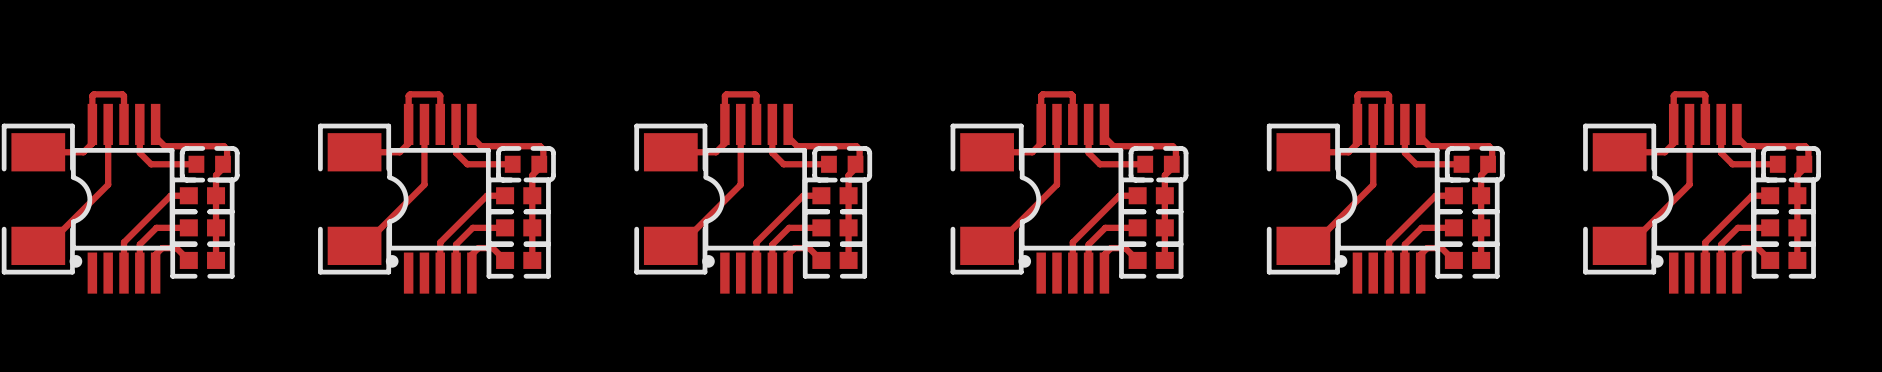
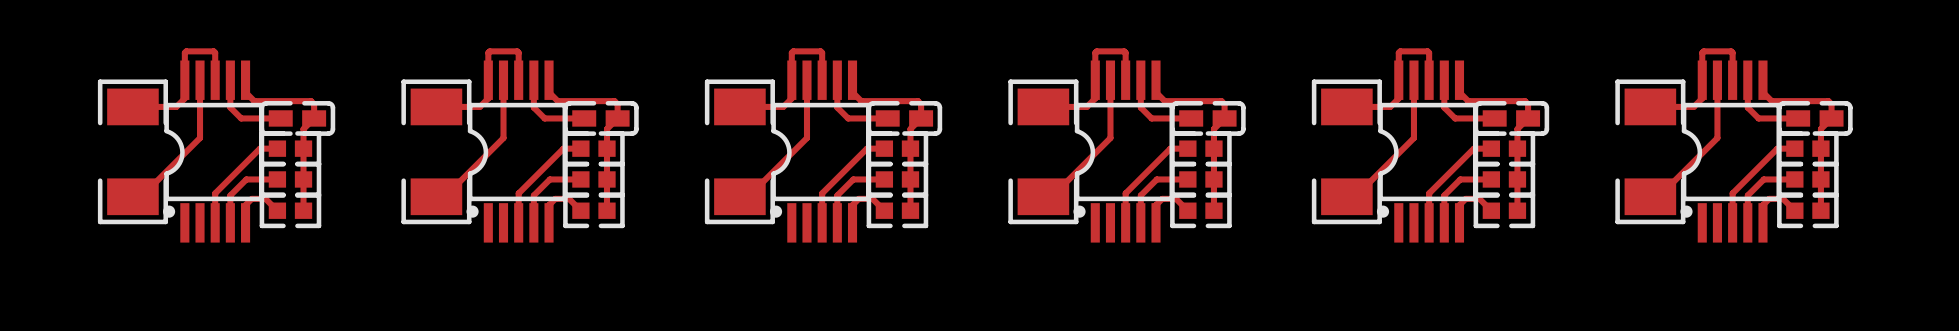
part footprint: [179, 146, 240, 183] -> [259, 101, 336, 136]
part footprint: [496, 146, 556, 183] -> [563, 101, 639, 136]
part footprint: [812, 146, 873, 183] -> [866, 101, 943, 136]
part footprint: [1128, 146, 1189, 183] -> [1170, 101, 1246, 136]
part footprint: [1444, 146, 1505, 183] -> [1473, 101, 1550, 136]
part footprint: [1761, 146, 1821, 183] -> [1777, 101, 1853, 136]

